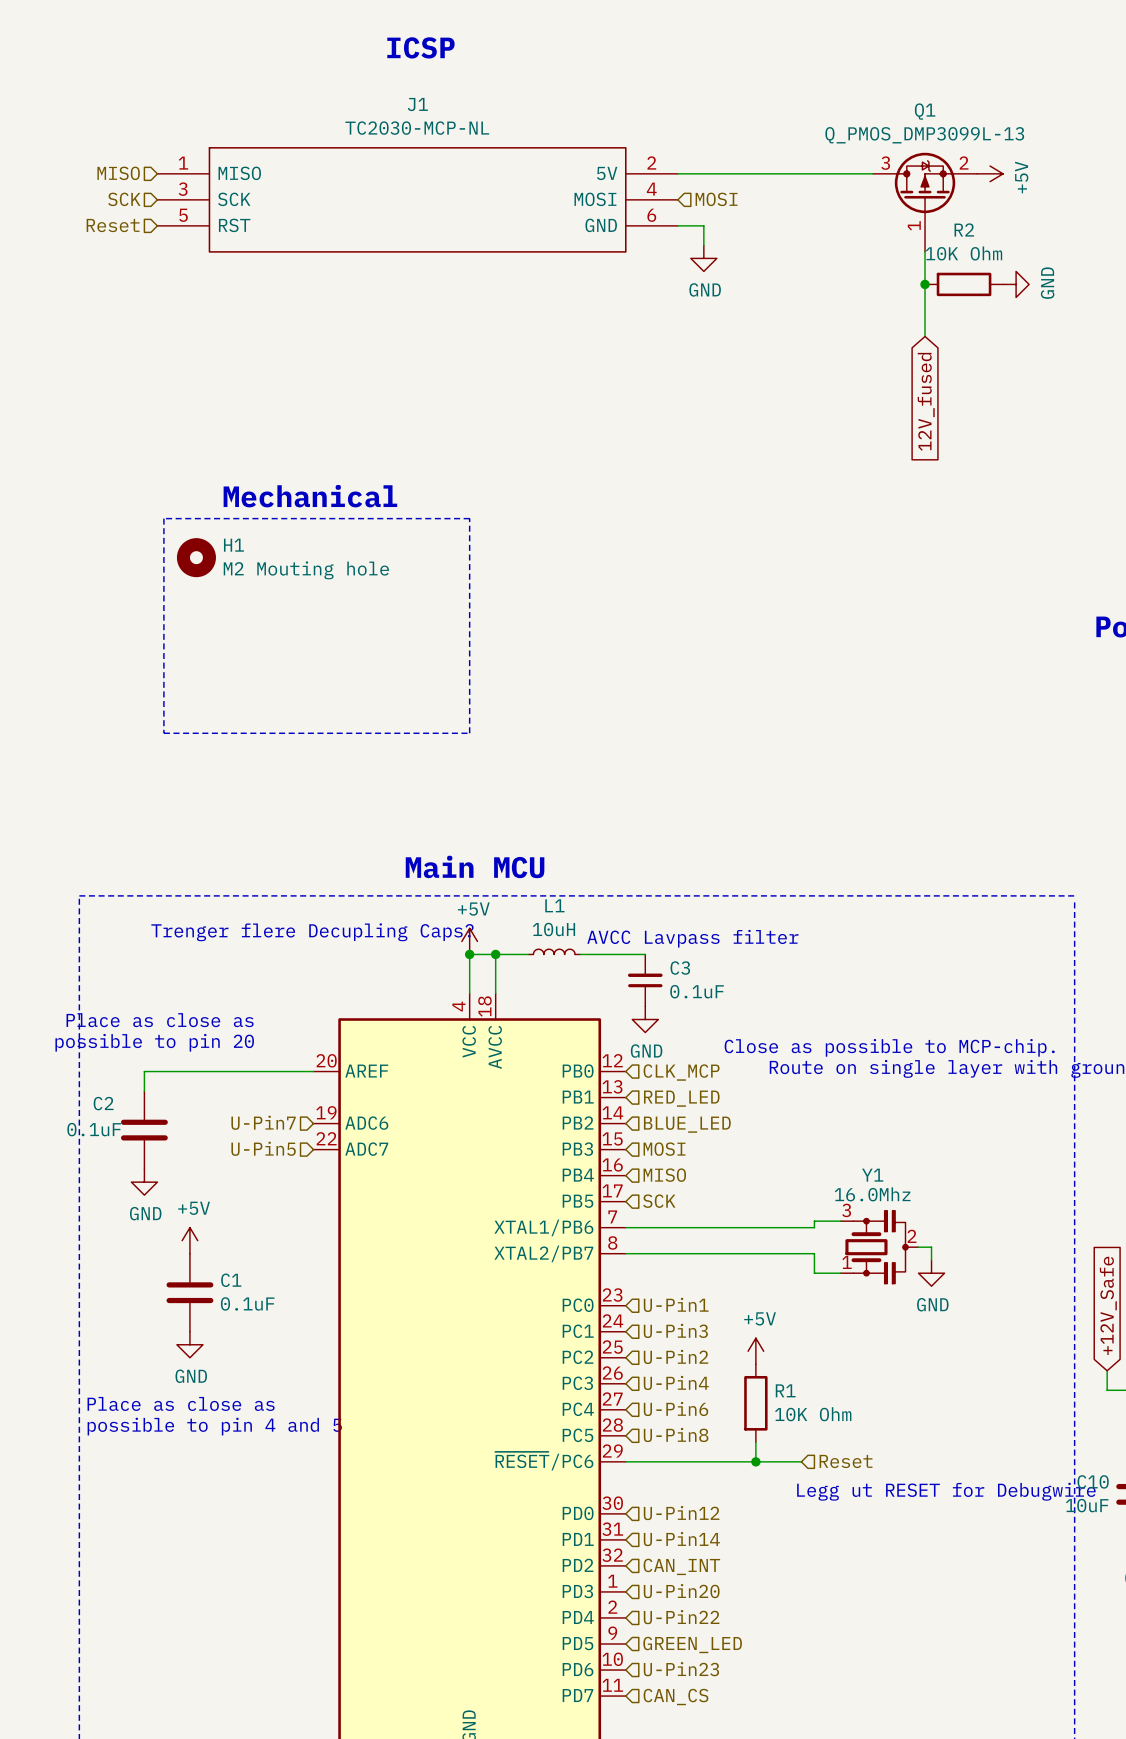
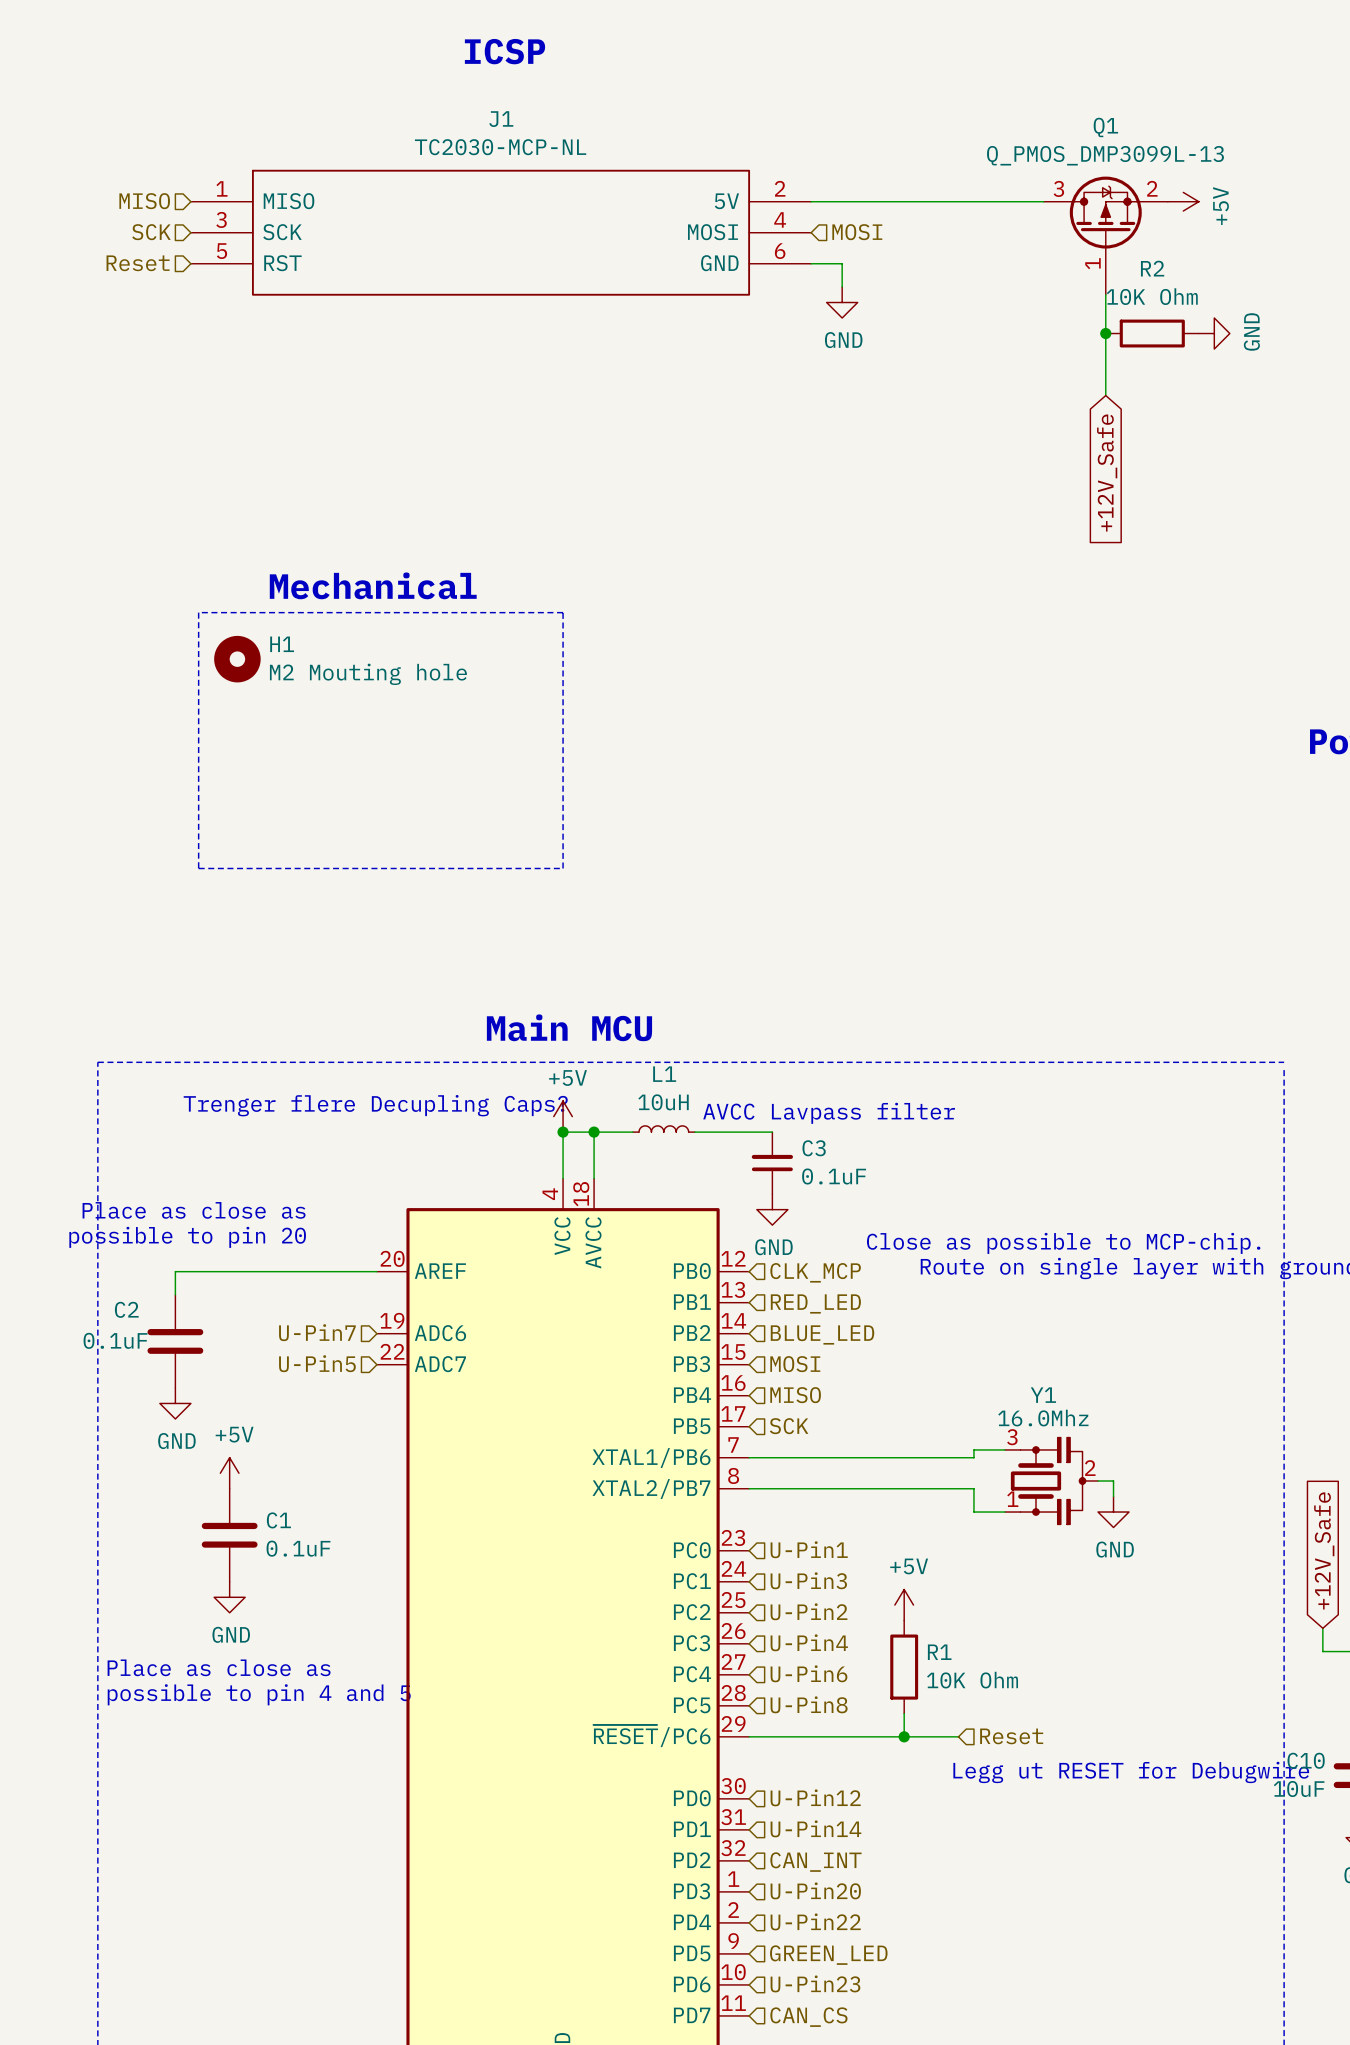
global label: 12V_fused (926, 401) -> +12V_Safe (1107, 473)

